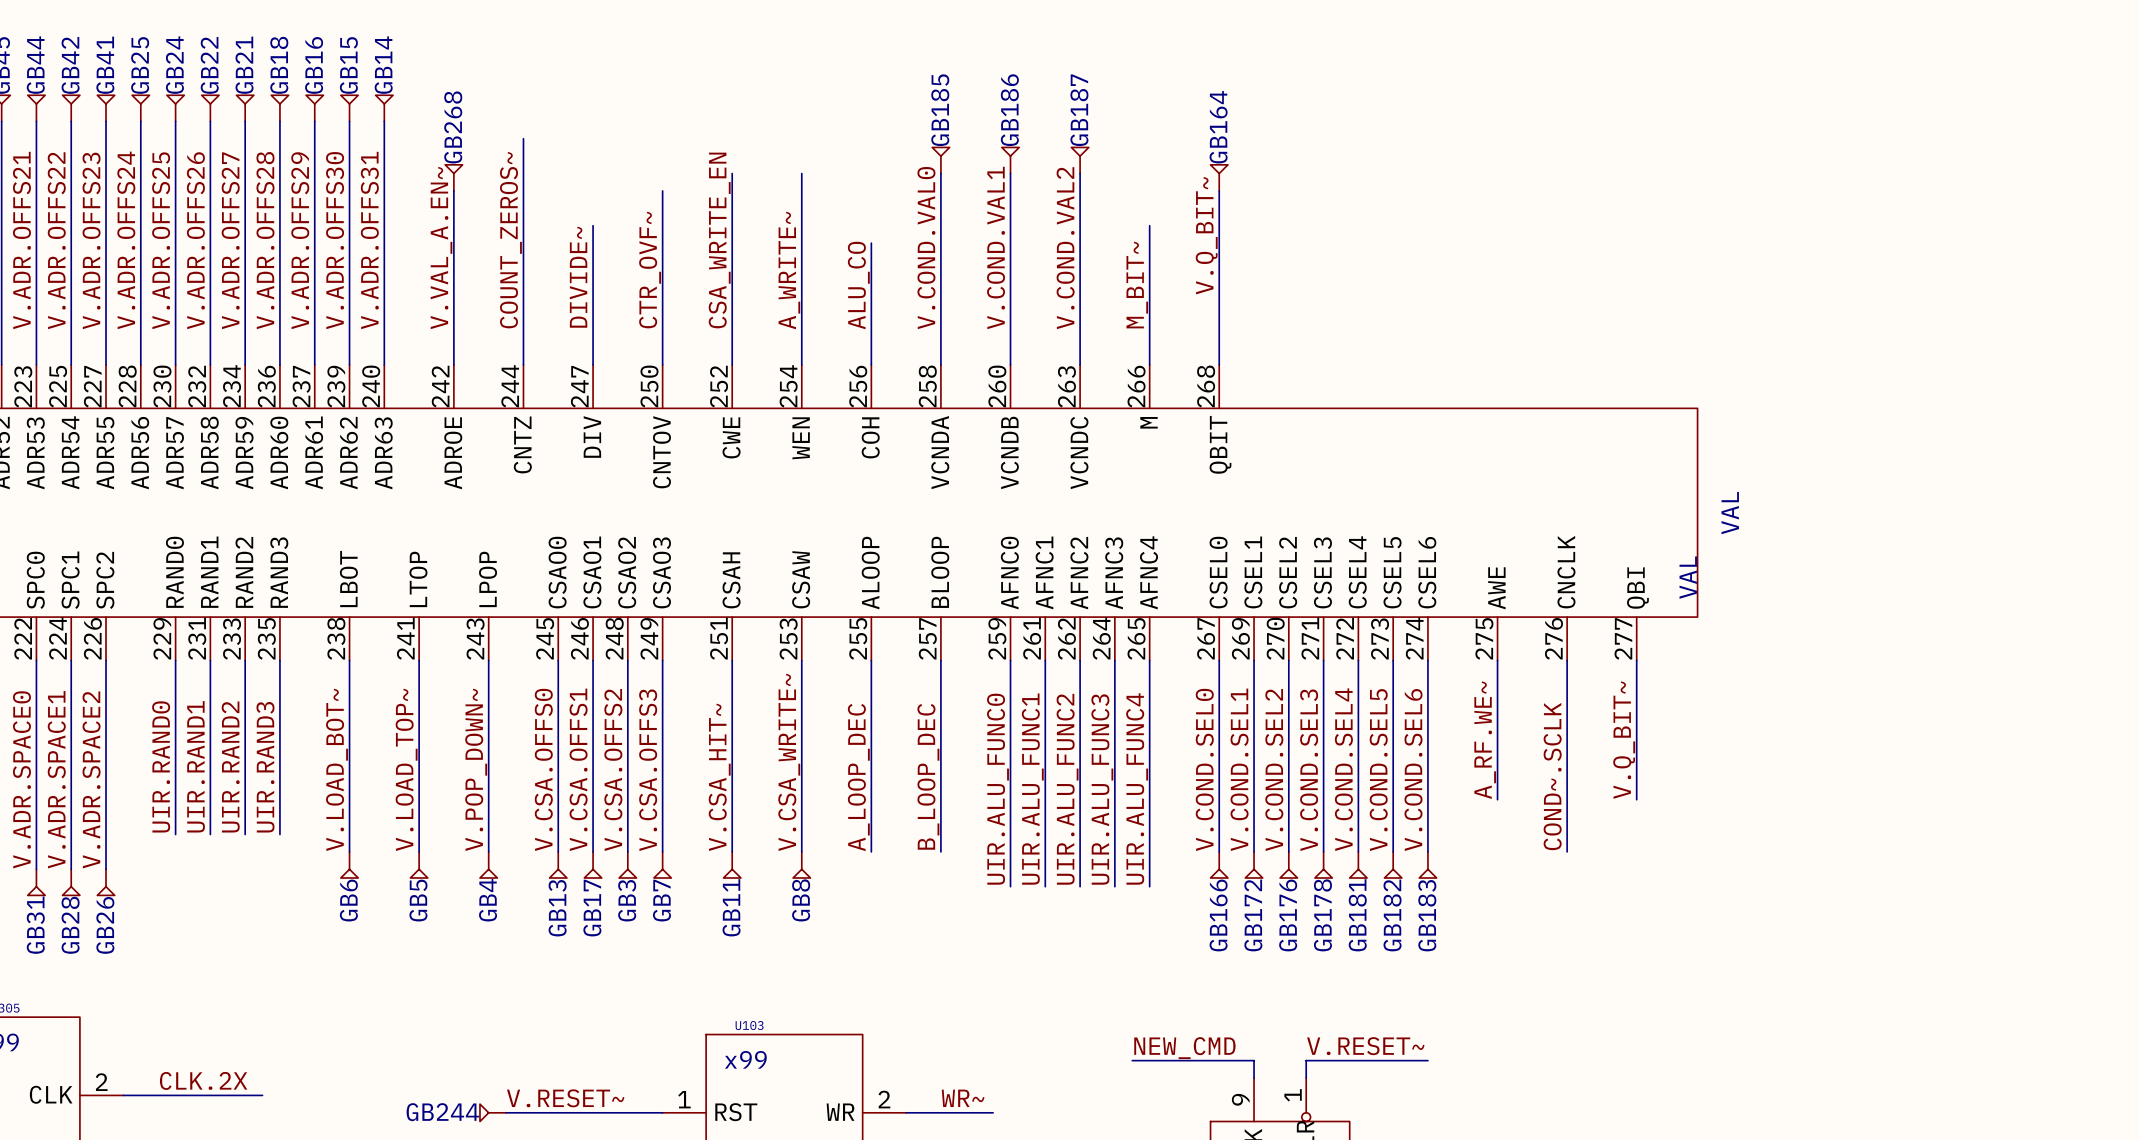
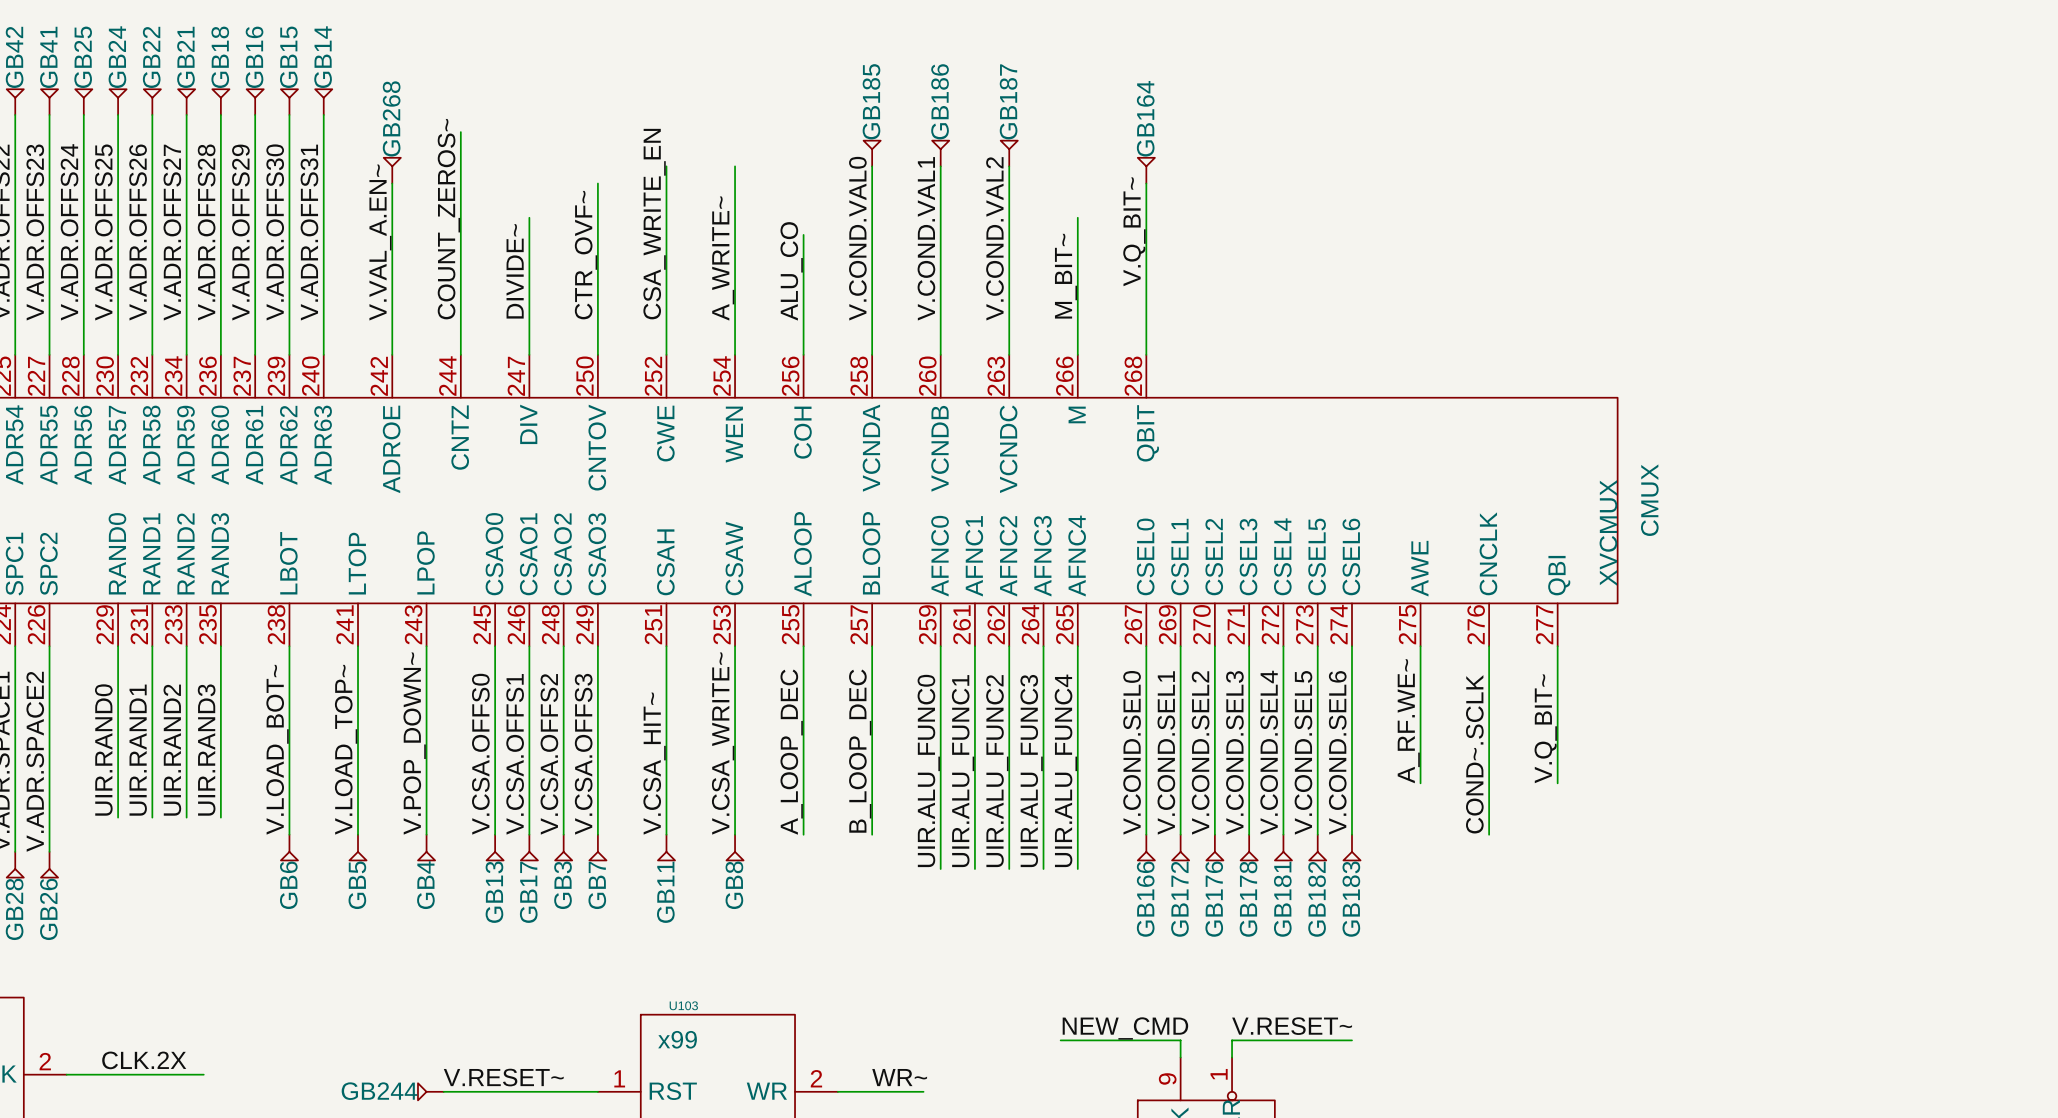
part text: VAL (1730, 513) -> CMUX (1649, 500)
part value: VAL (1688, 577) -> XVCMUX (1608, 532)

